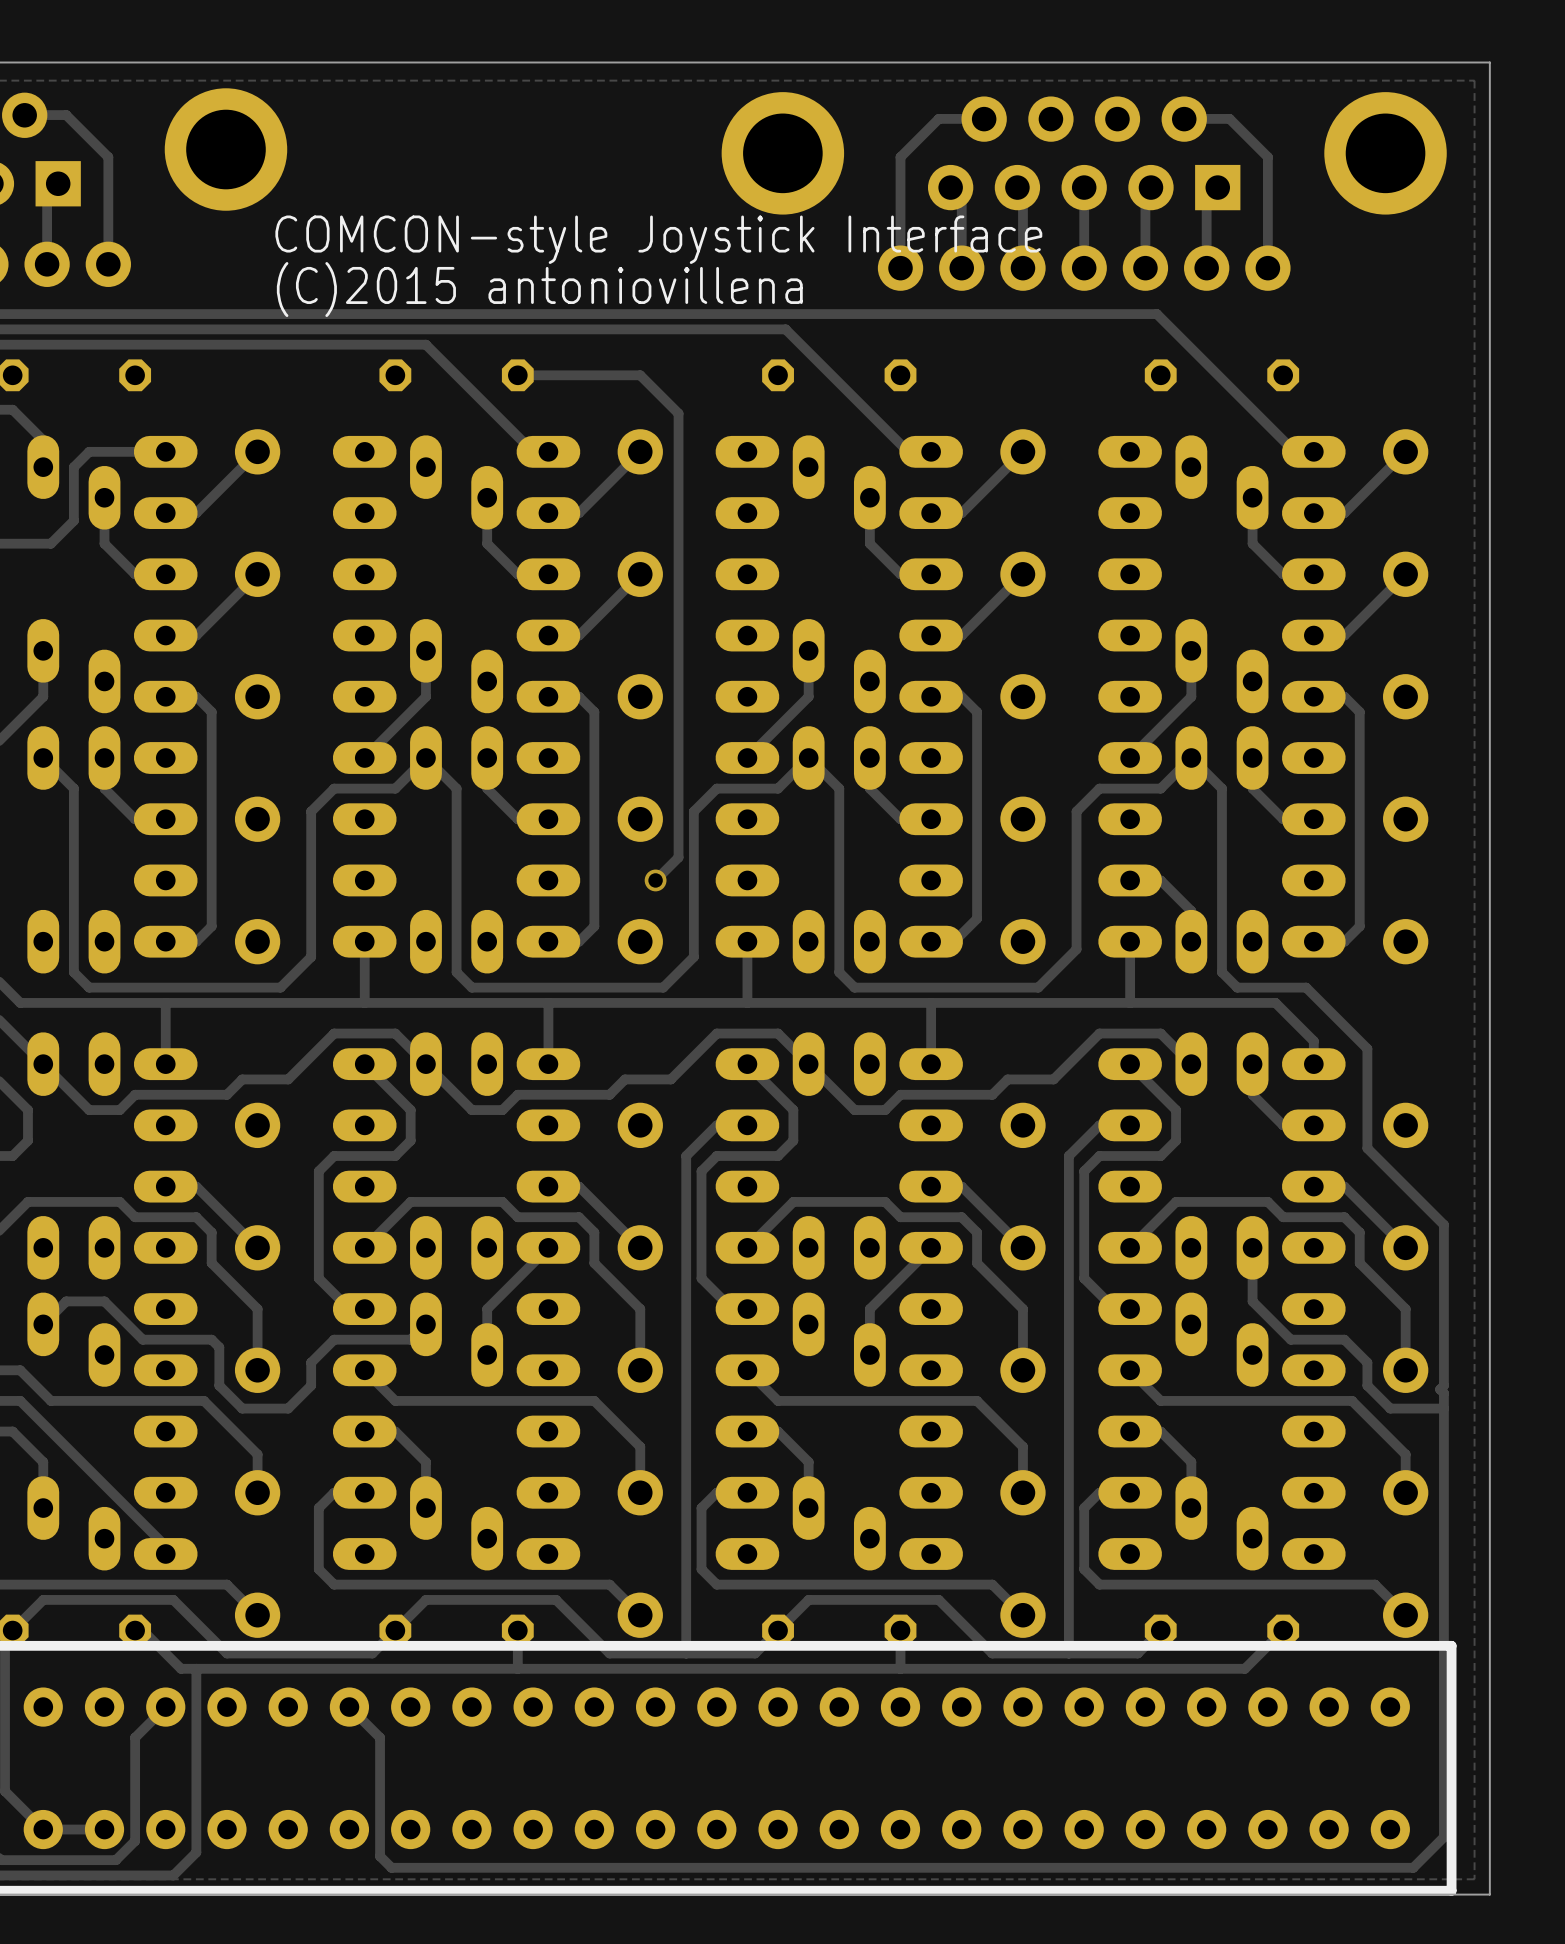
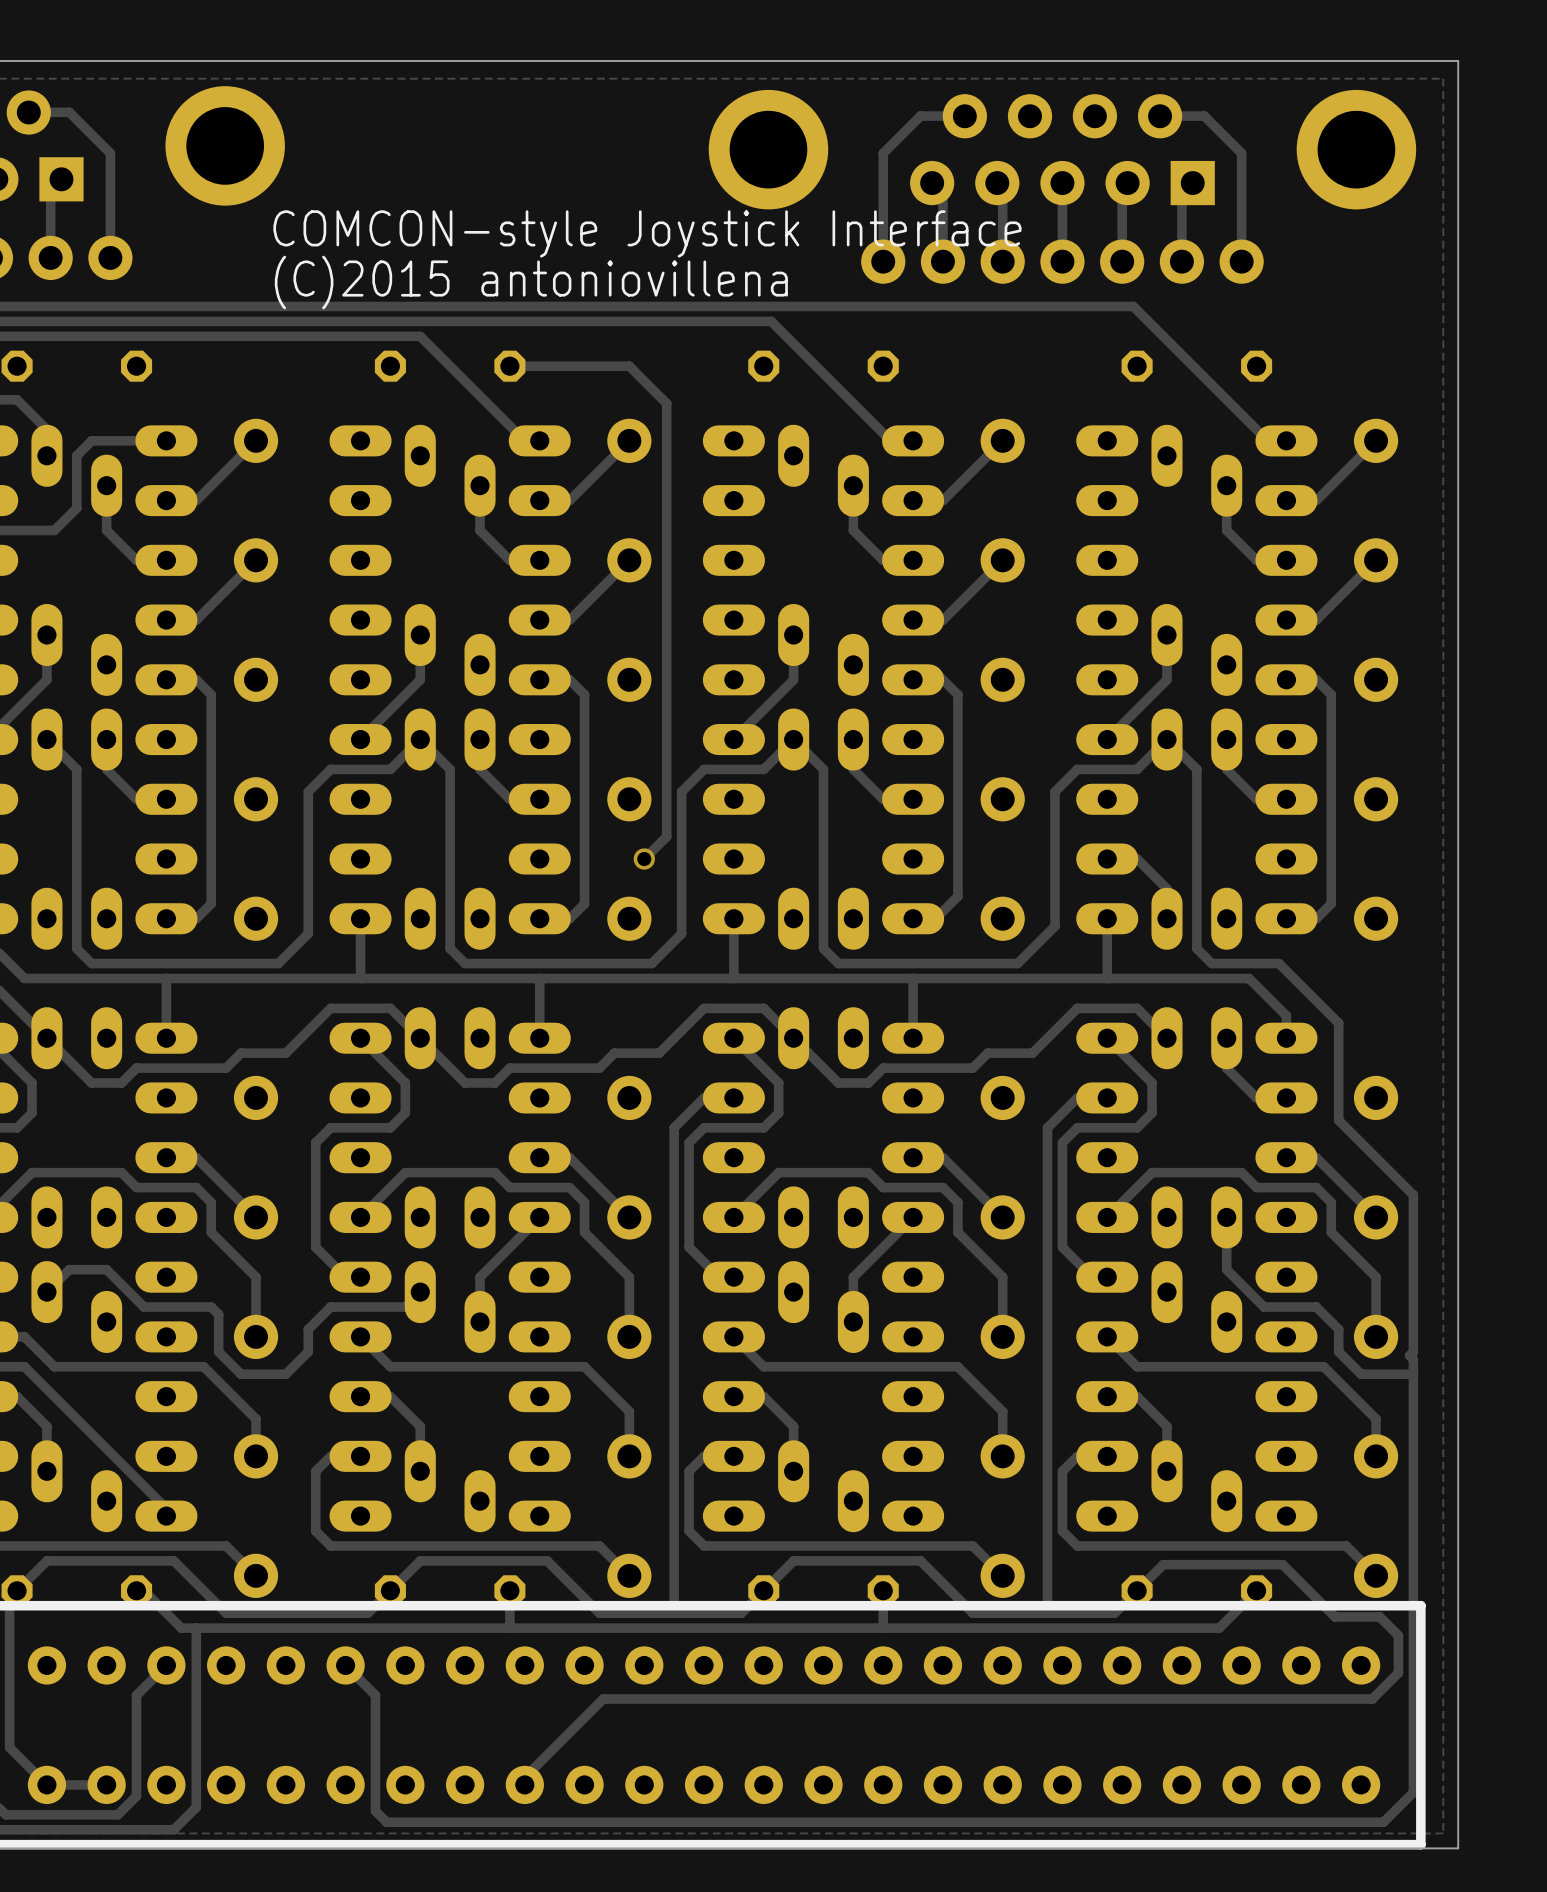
track: none -> (1137, 1590) (1163, 1564) (1282, 1564) (1334, 1616) (1379, 1616) (1398, 1635) (1398, 1672) (1372, 1699) (603, 1699) (524, 1777) (524, 1784)

